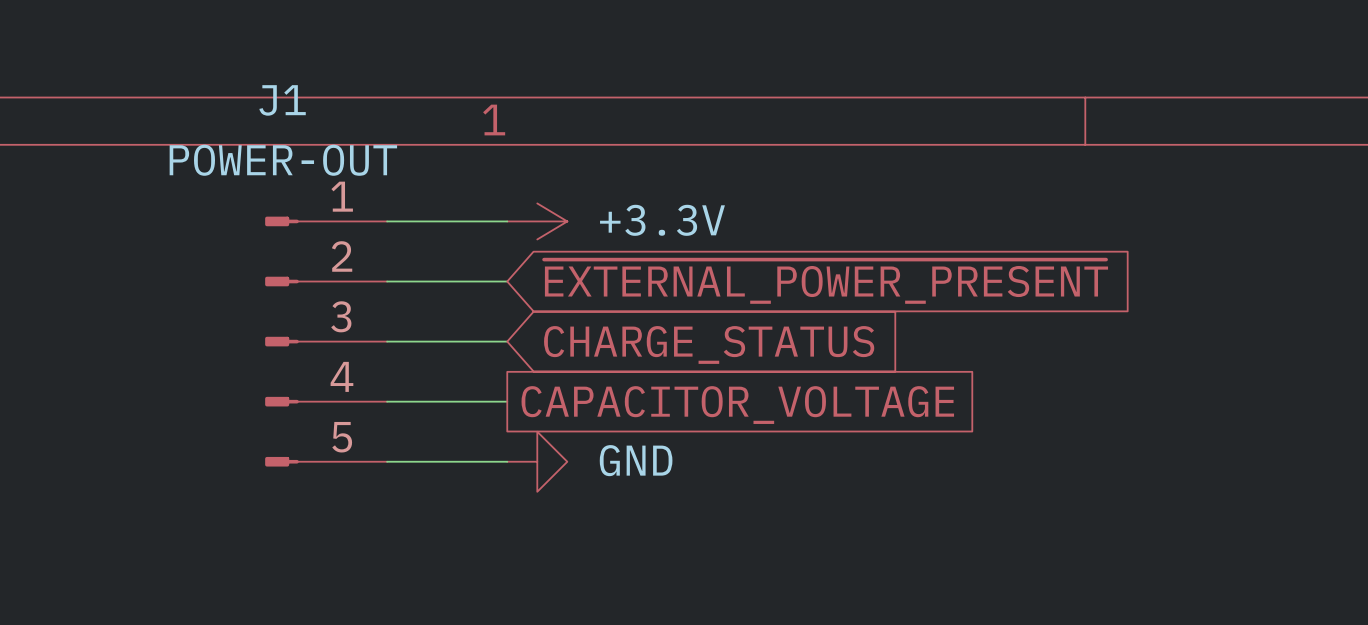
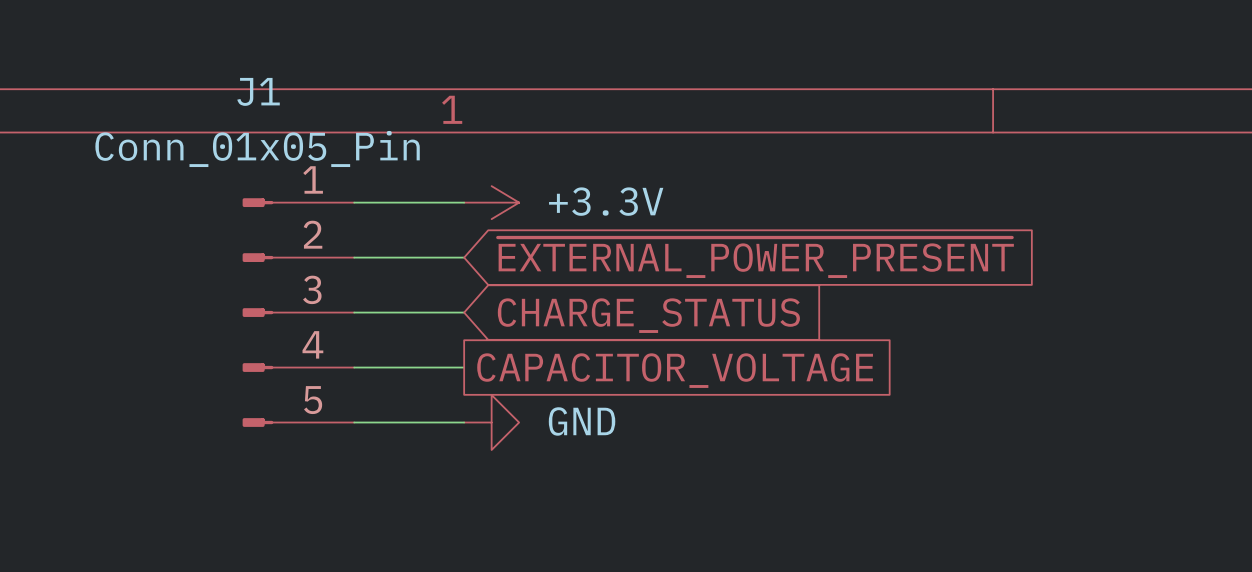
J1 value: POWER-OUT (283, 160) -> Conn_01x05_Pin (257, 148)

